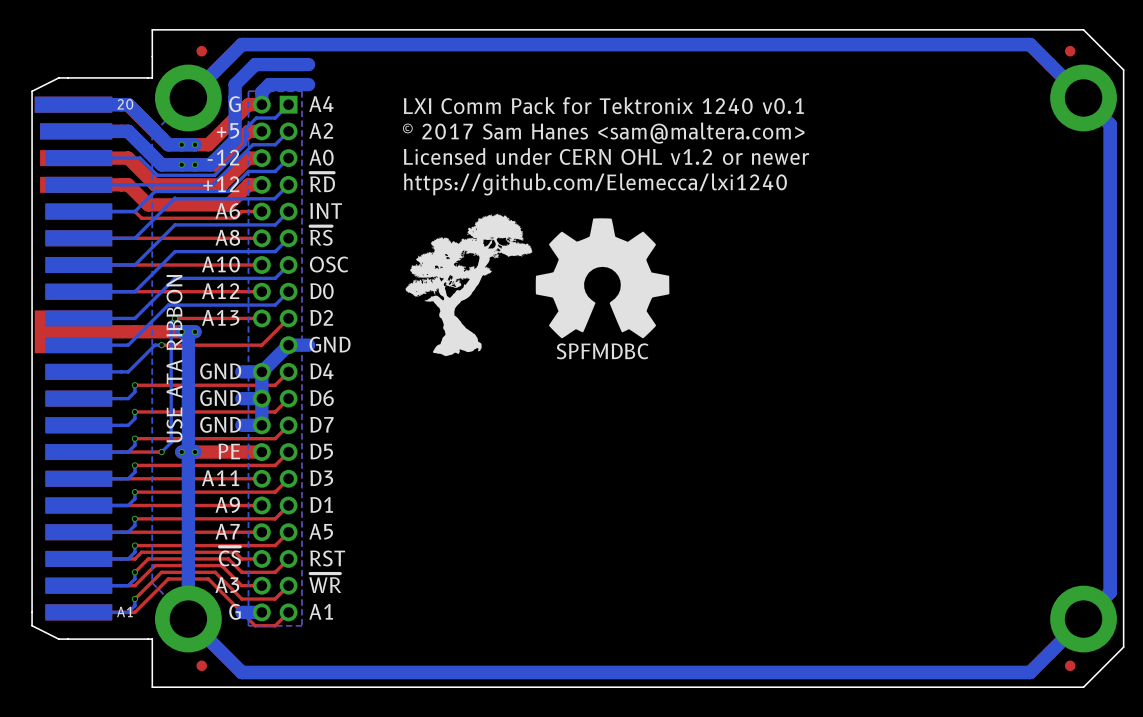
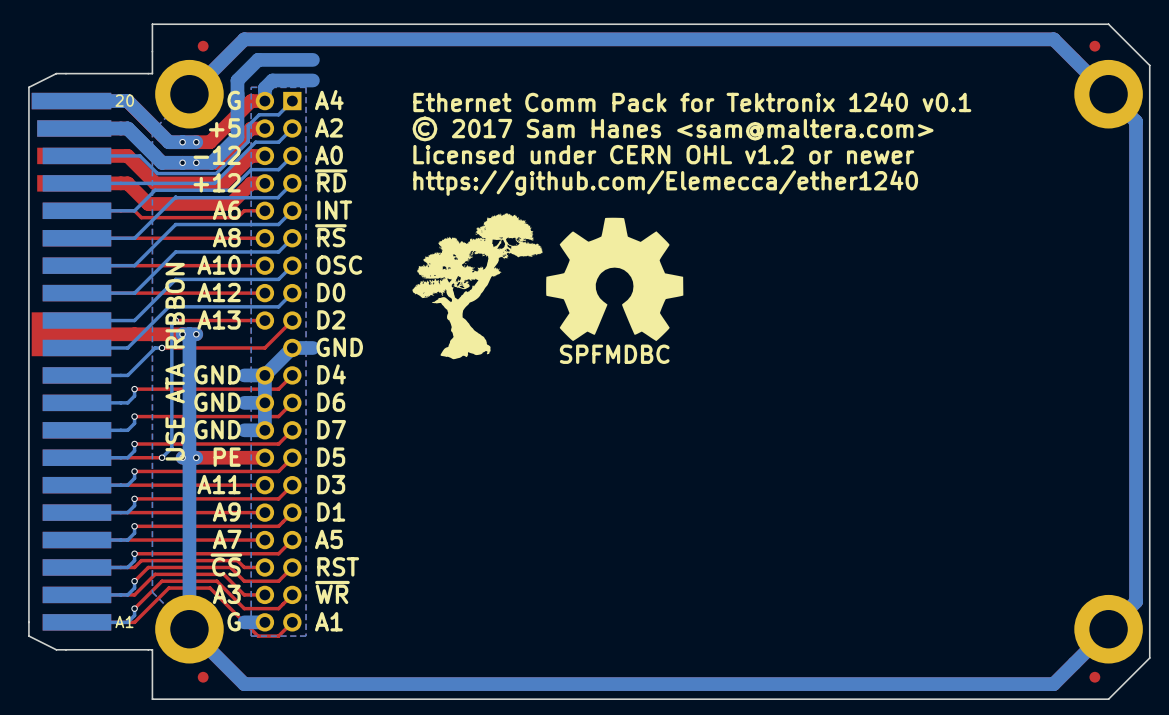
text: LXI Comm Pack for Tektronix 1240 v0.1 (603, 105) -> Ethernet Comm Pack for Tektronix 1240 v0.1 (692, 102)
text: https://github.com/Elemecca/lxi1240 (595, 184) -> https://github.com/Elemecca/ether1240 (665, 183)

